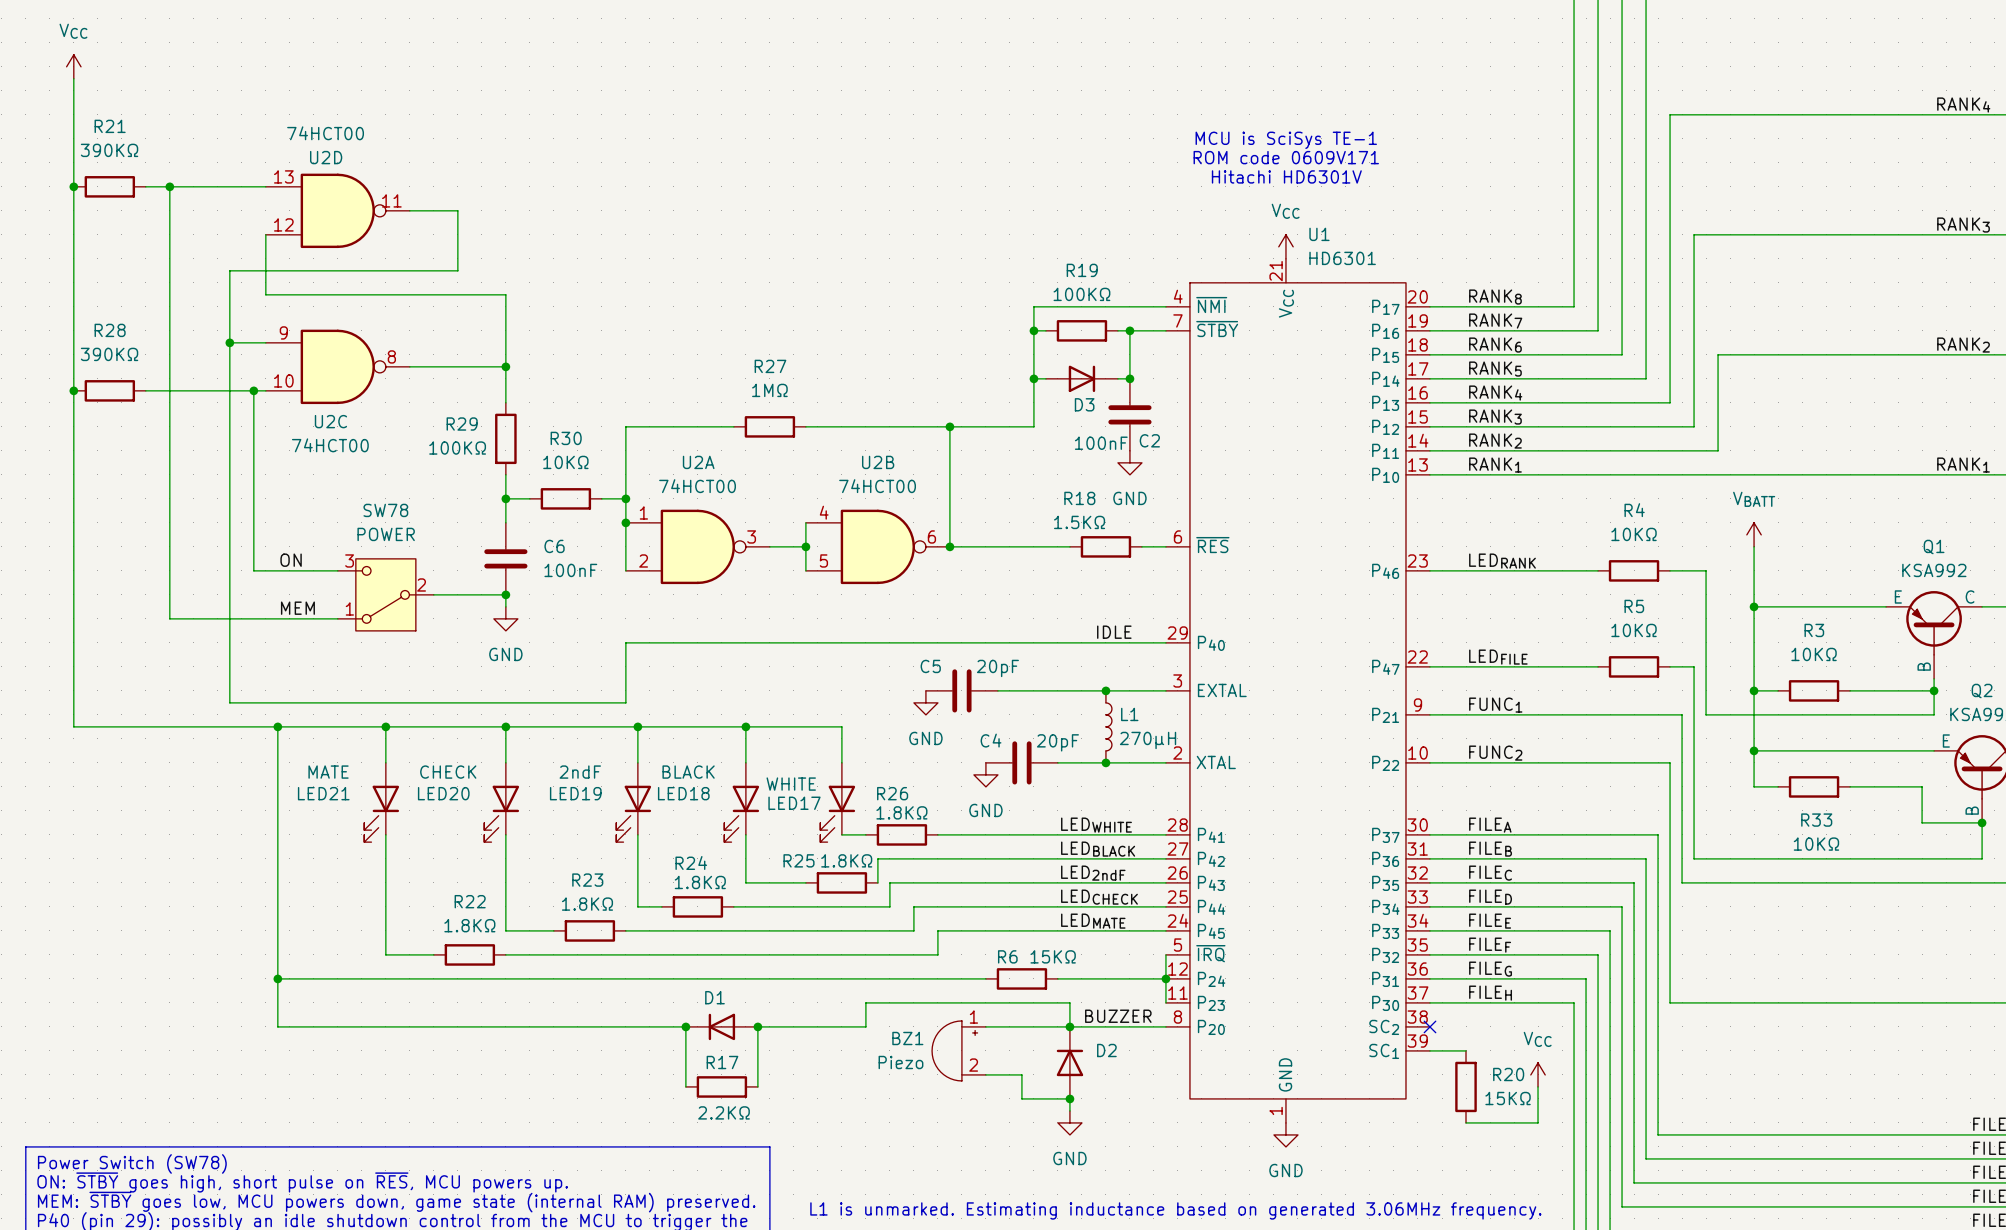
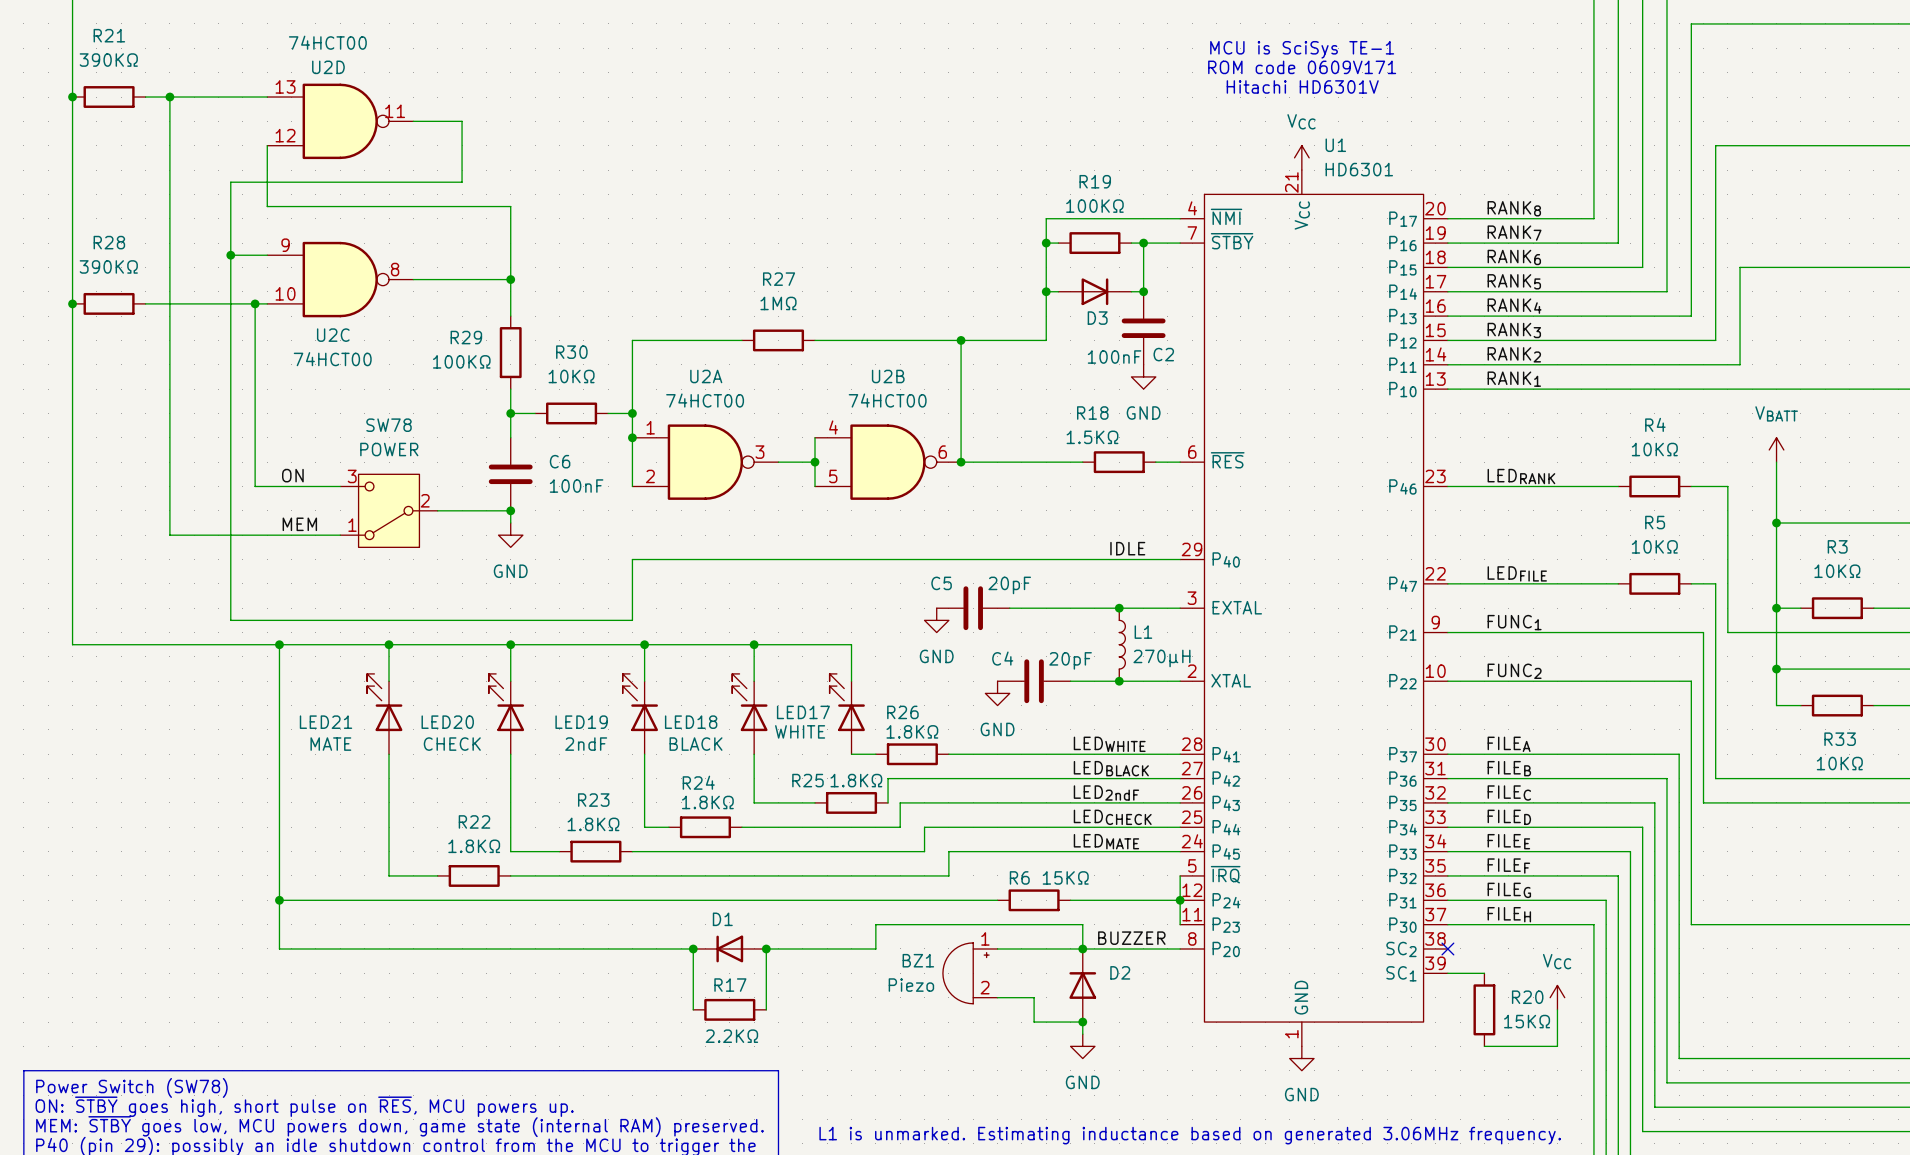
LED21 flip: as is (381, 813) -> up-down (384, 702)
LED20 flip: as is (501, 813) -> up-down (506, 702)
LED19 flip: as is (633, 813) -> up-down (640, 702)
LED18 flip: as is (741, 813) -> up-down (749, 702)
LED17 flip: as is (837, 813) -> up-down (847, 702)

